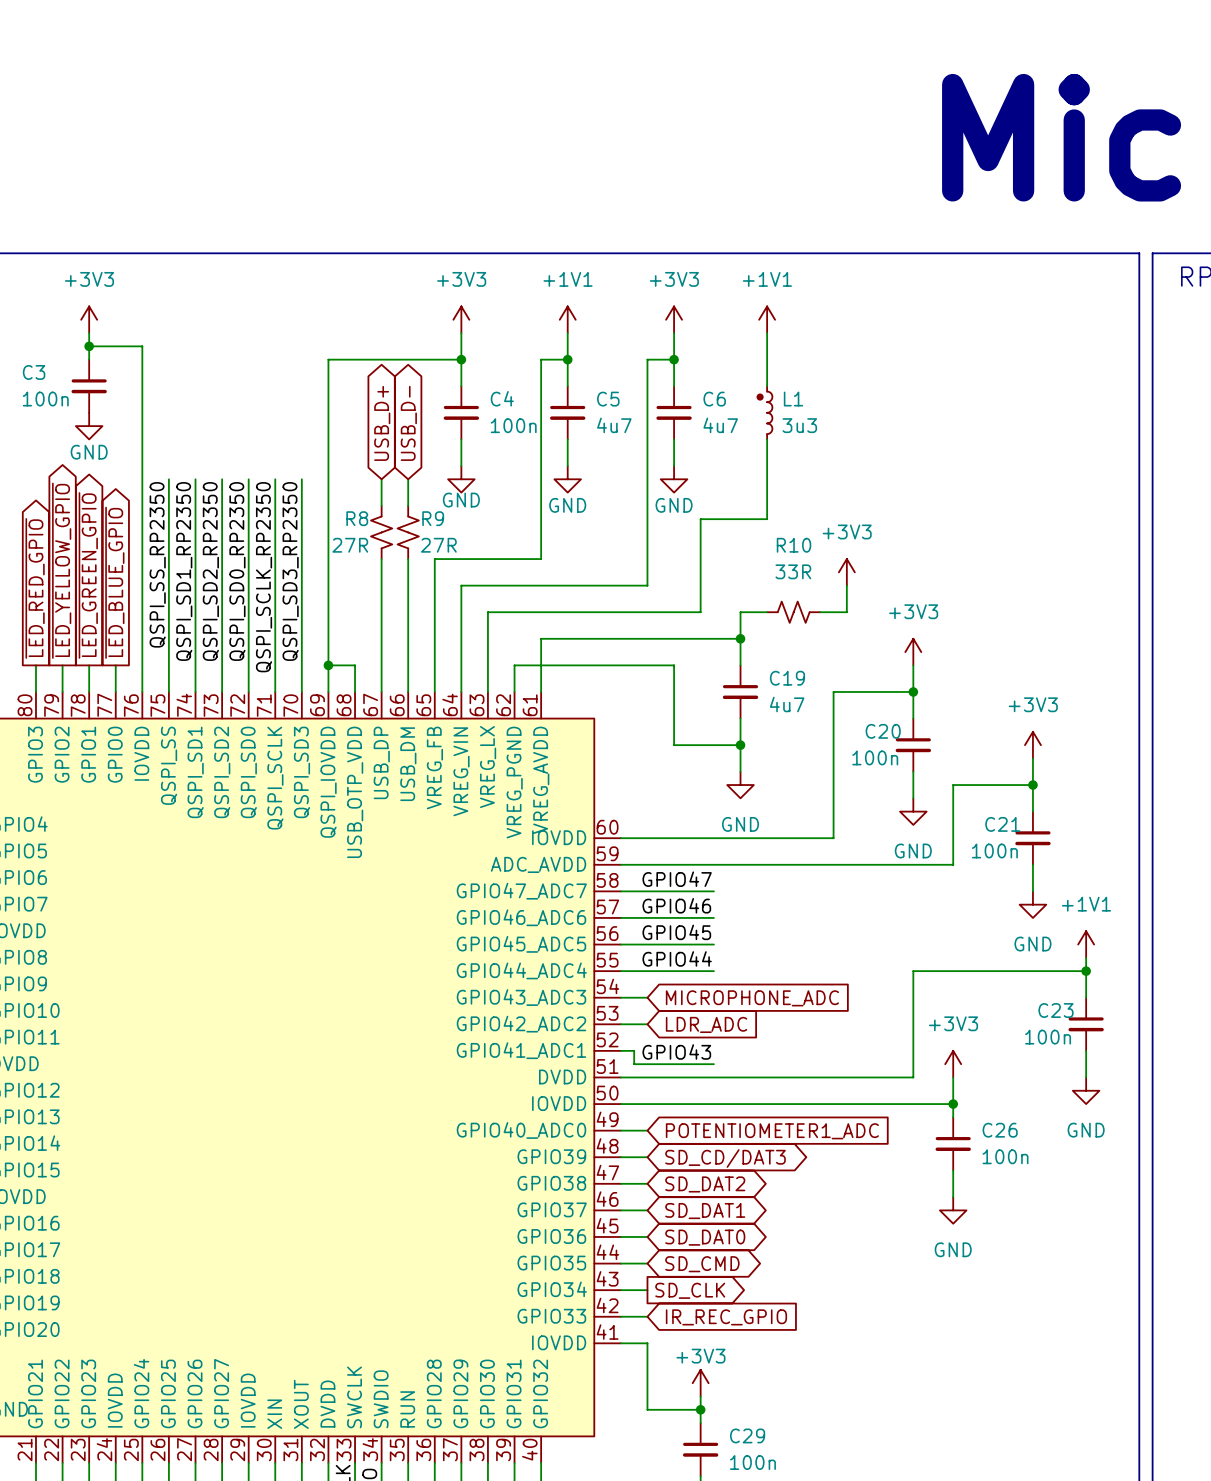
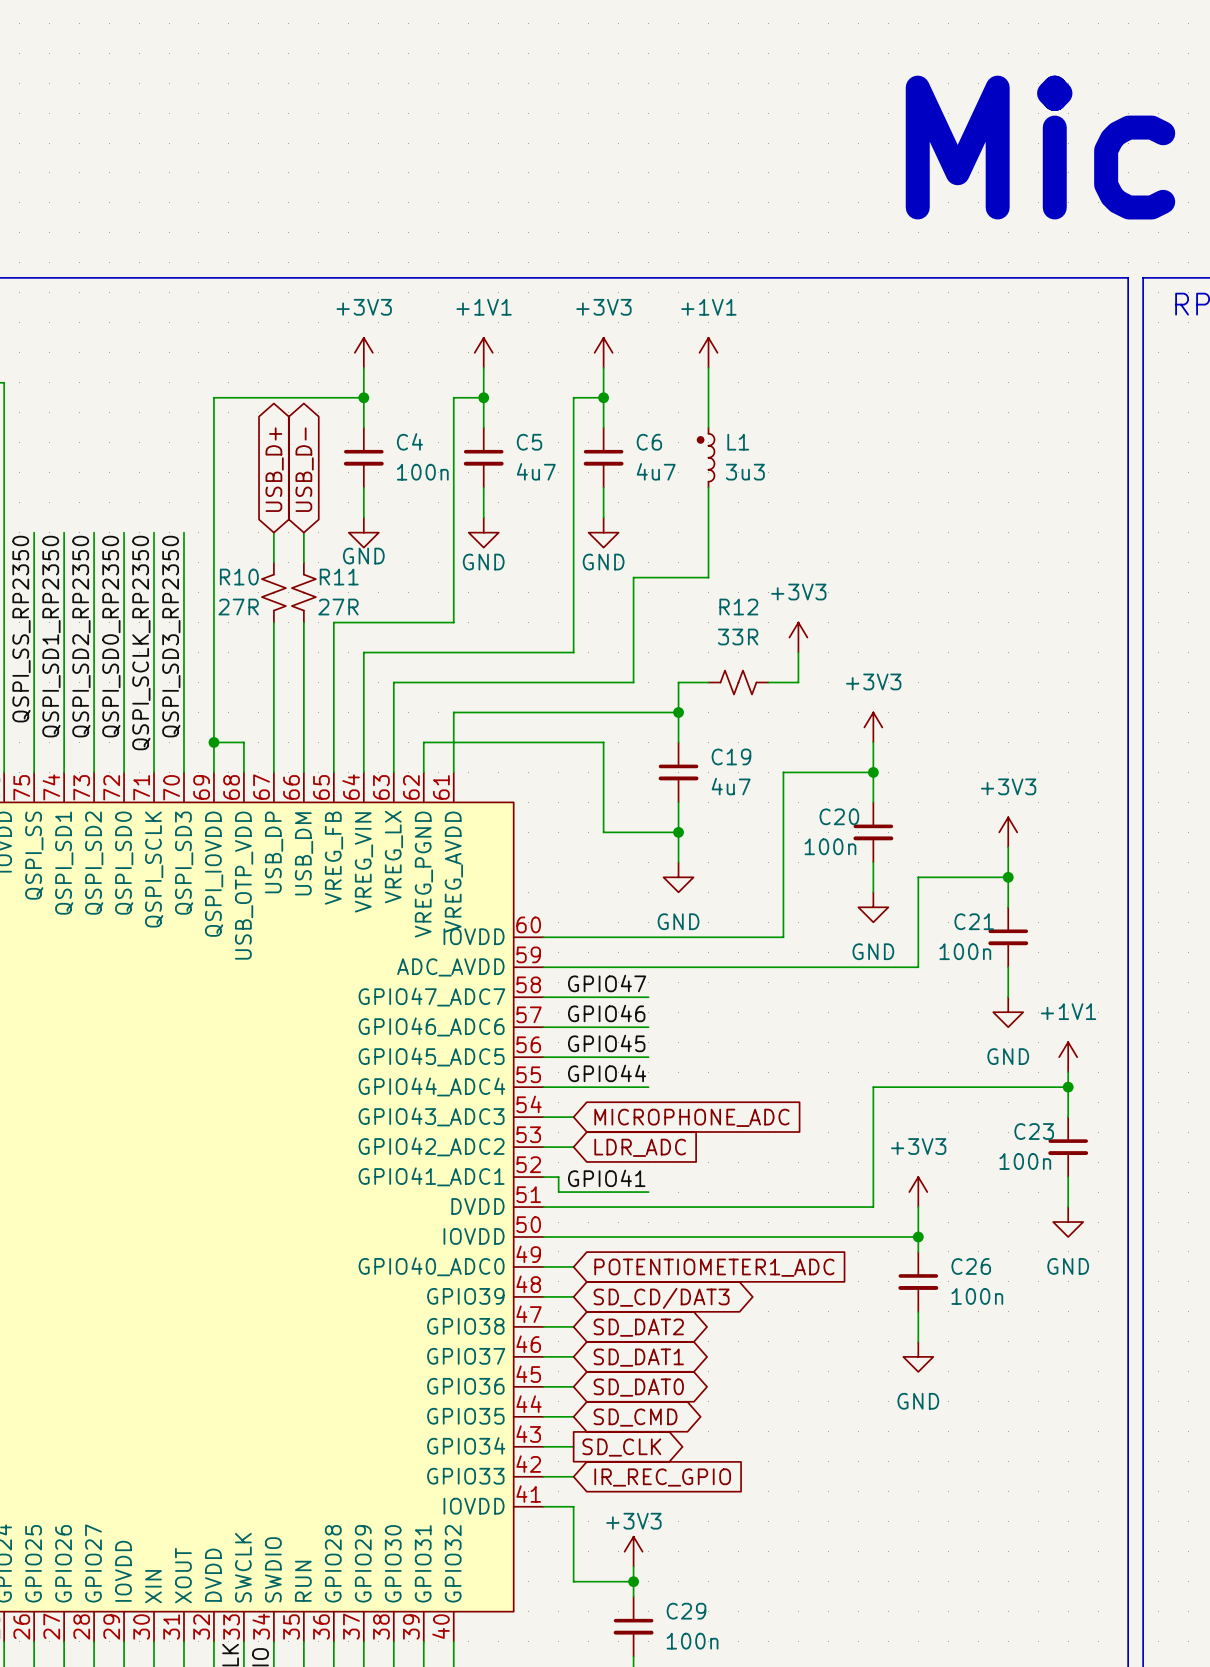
R8 name: R8 (357, 518) -> R10 (239, 577)
R9 name: R9 (433, 518) -> R11 (339, 577)
R10 name: R10 (794, 545) -> R12 (738, 607)
label: GPIO43 (676, 1052) -> GPIO41 (606, 1178)

